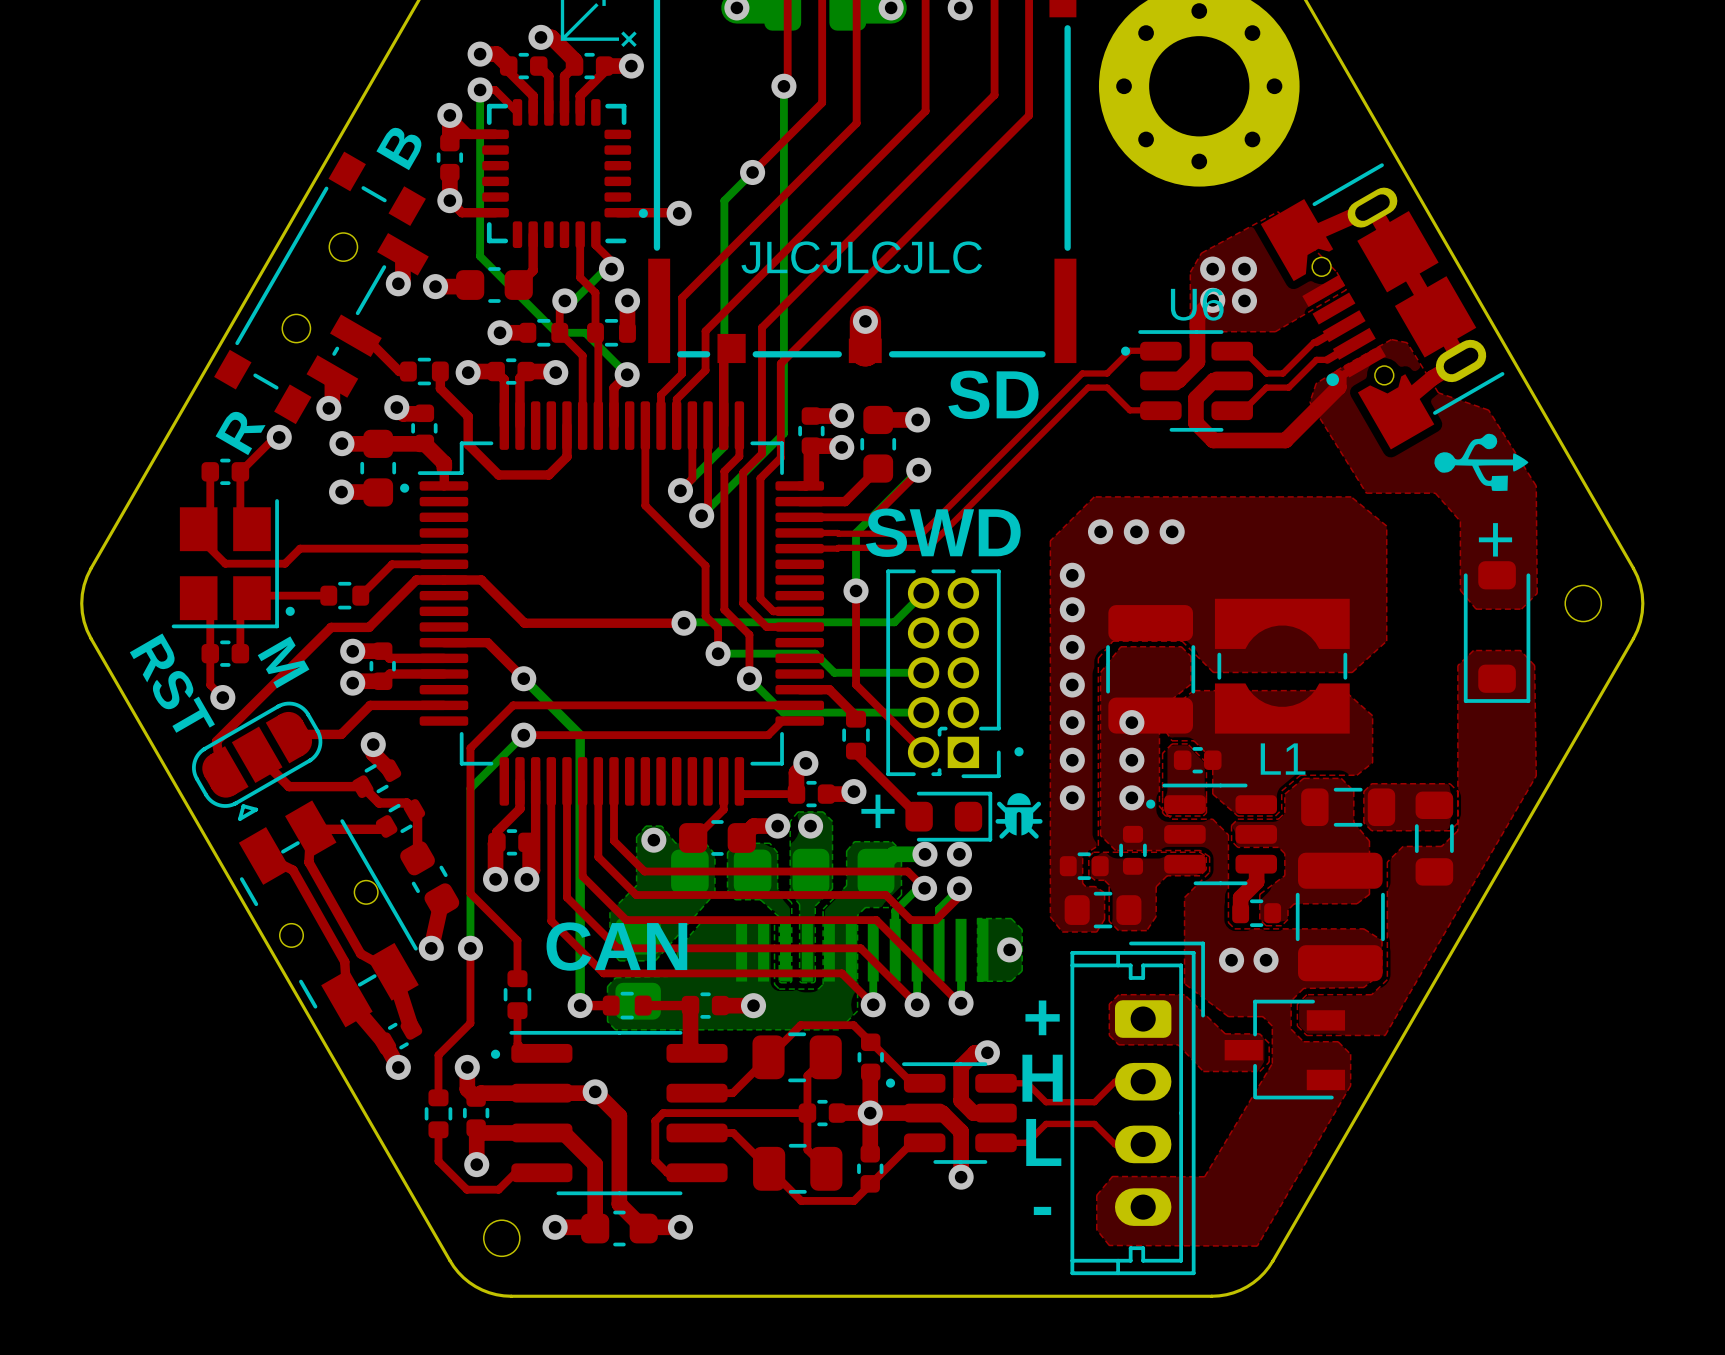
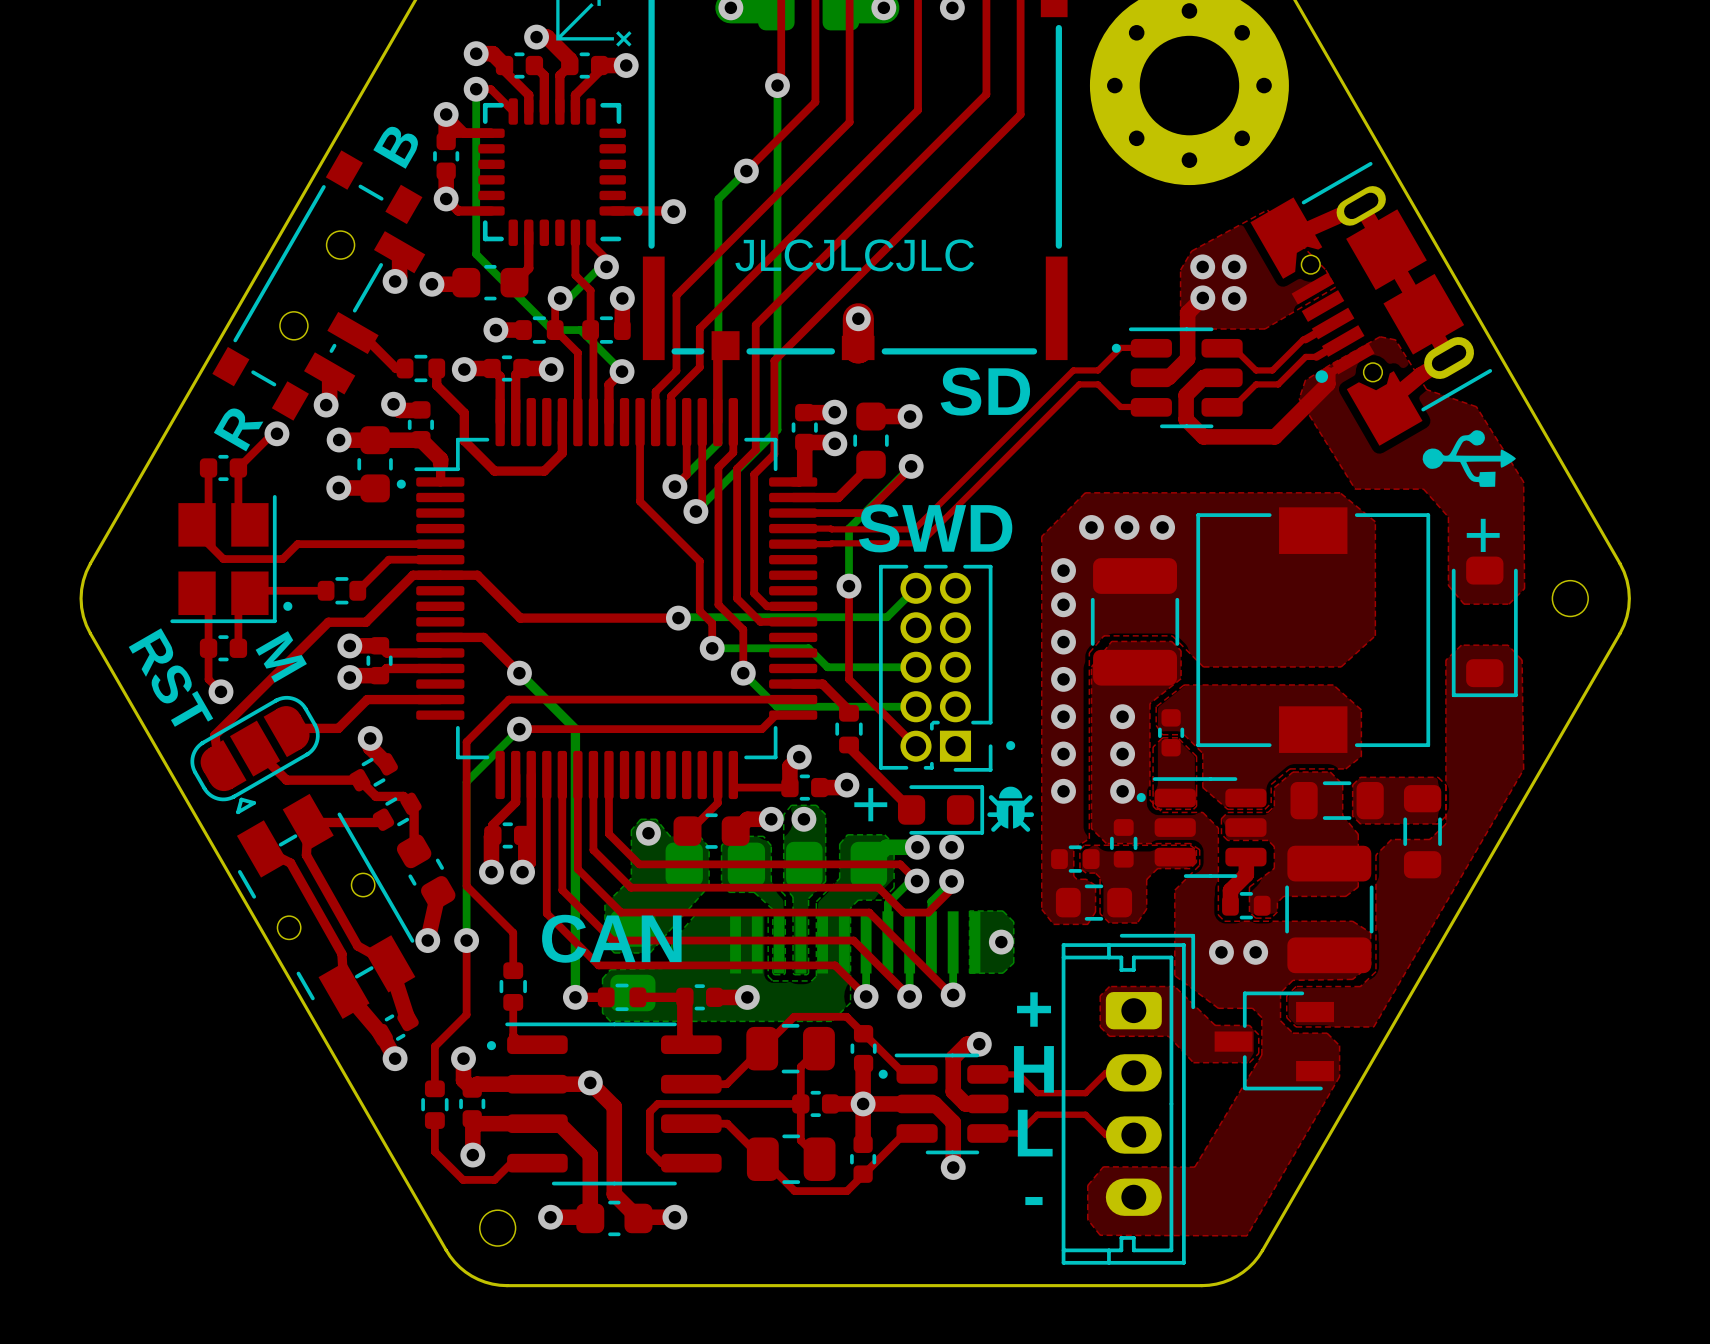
U6 name: U6 (1197, 304) -> none
part: none -> (1313, 630)
L1: (1282, 666) -> none
part position: (1150, 669) -> (1135, 621)
part rotation: 0° (1197, 760) -> 90° clockwise (1171, 732)

